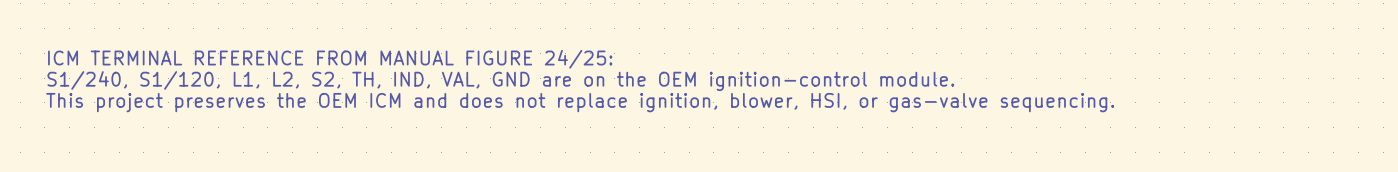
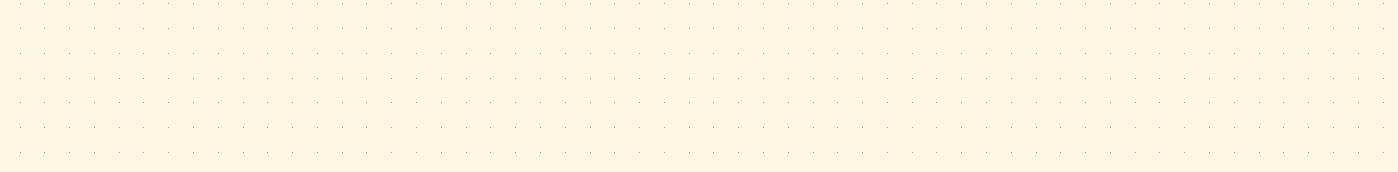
text: ICM TERMINAL REFERENCE FROM MANUAL FIGURE 24/25: (330, 59) -> none
text: S1/240, S1/120, L1, L2, S2, TH, IND, VAL, GND are on the OEM ignition-control module. (500, 81) -> none
text: This project preserves the OEM ICM and does not replace ignition, blower, HSI, or gas-valve sequencing. (580, 102) -> none

